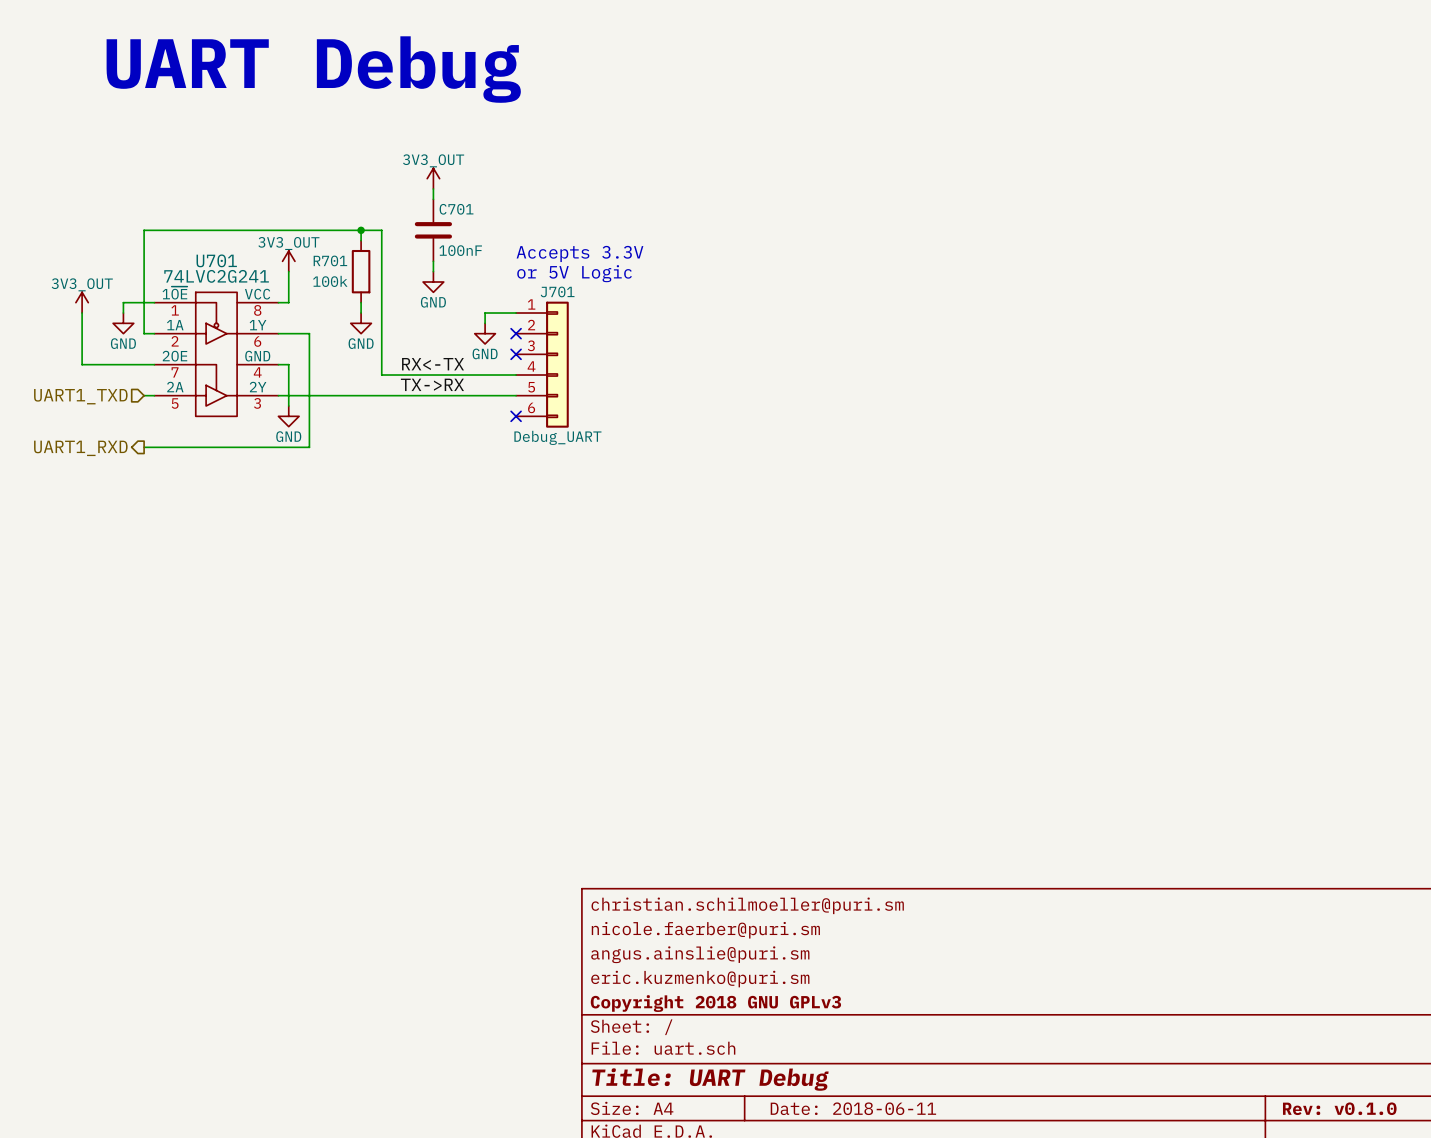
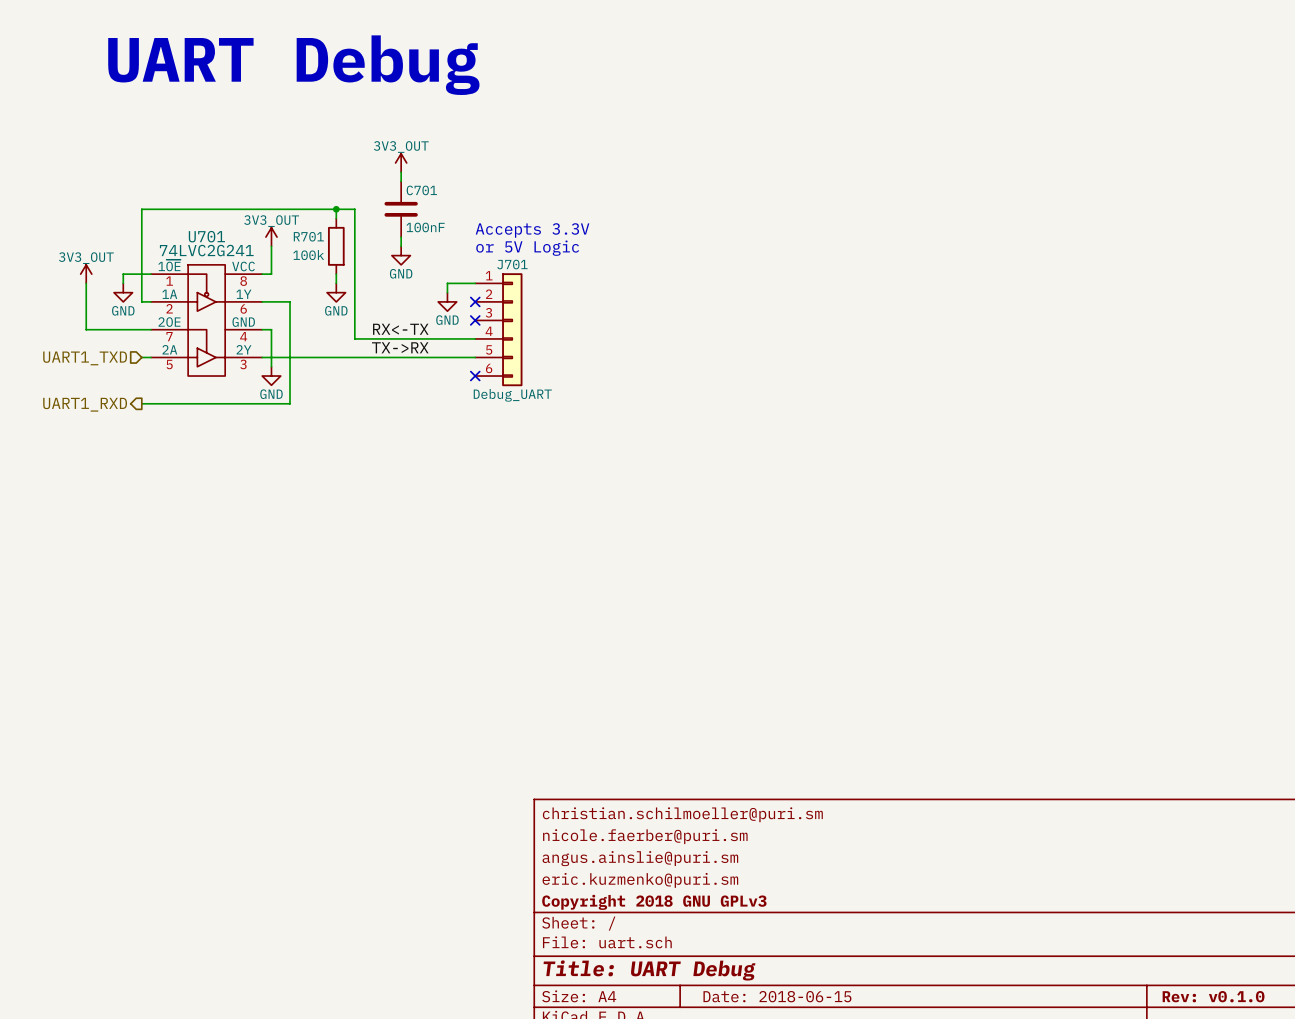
title block: Date: 2018-06-11 (853, 1108) -> Date: 2018-06-15 (777, 996)

